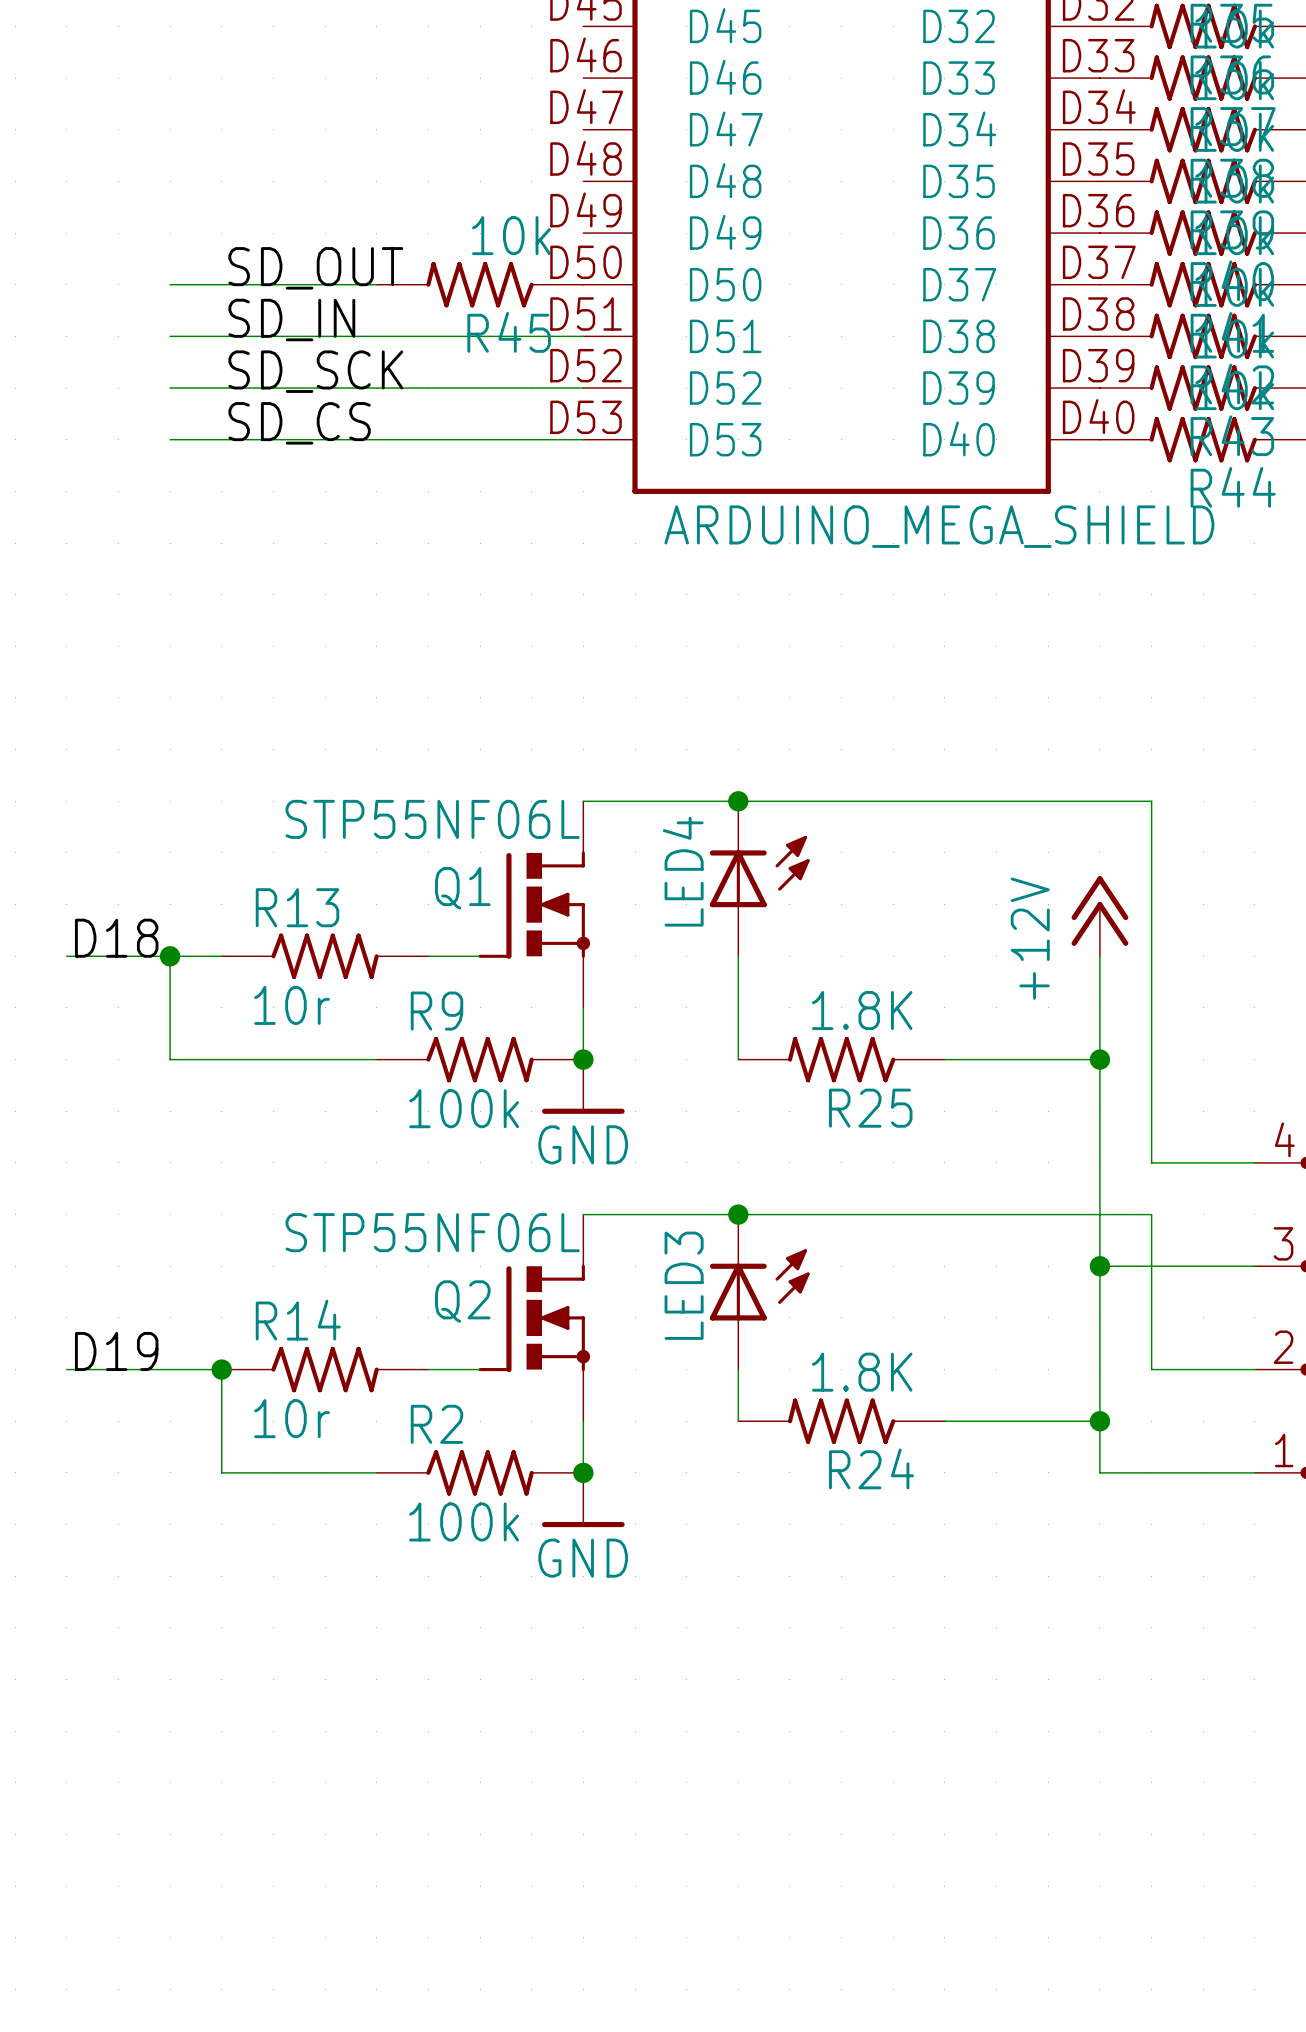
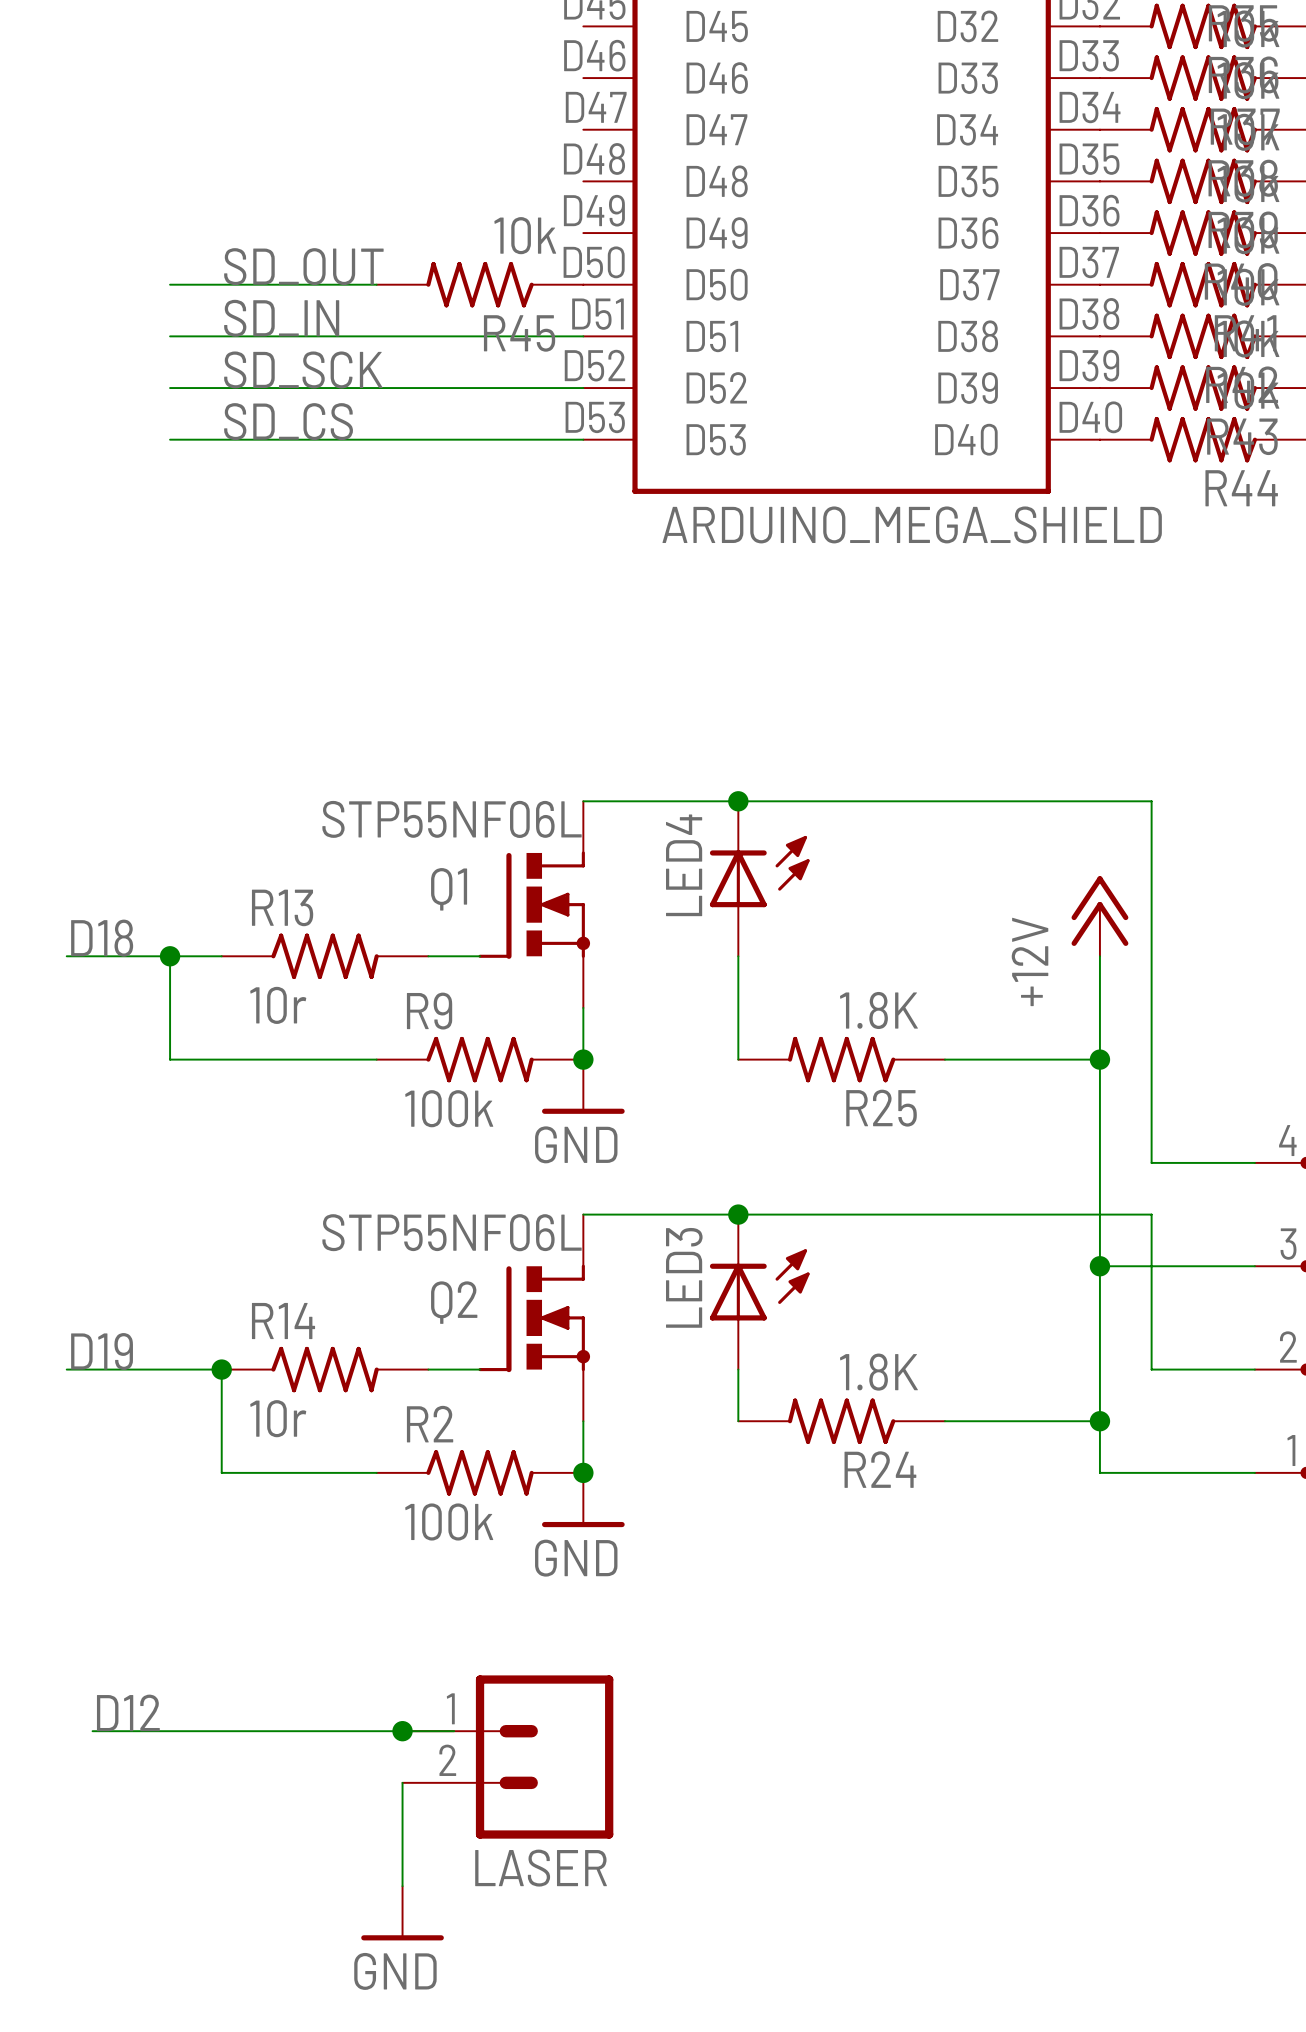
label: none -> D12 (128, 1712)
wire: none -> (92, 1731) (454, 1731)
junction: none -> (402, 1731)
LASER: none -> (507, 1757)
wire: none -> (402, 1782) (402, 1886)
power symbol: none -> GND (402, 1913)

